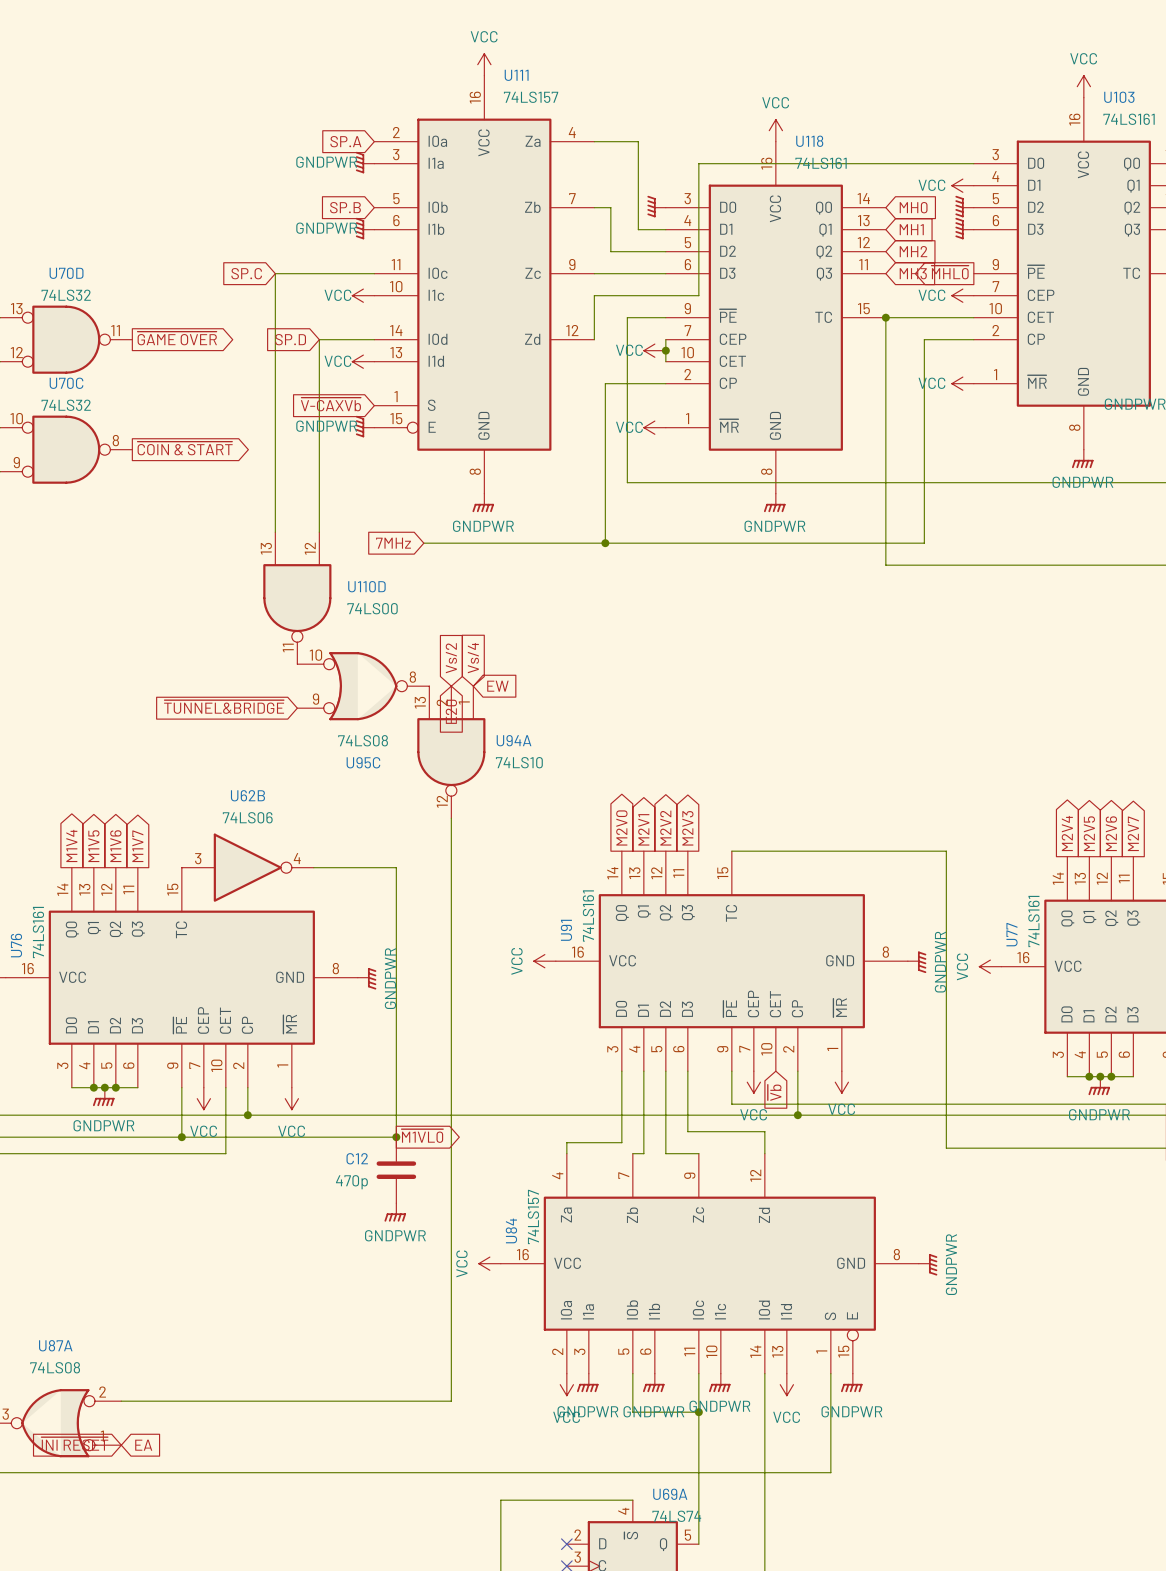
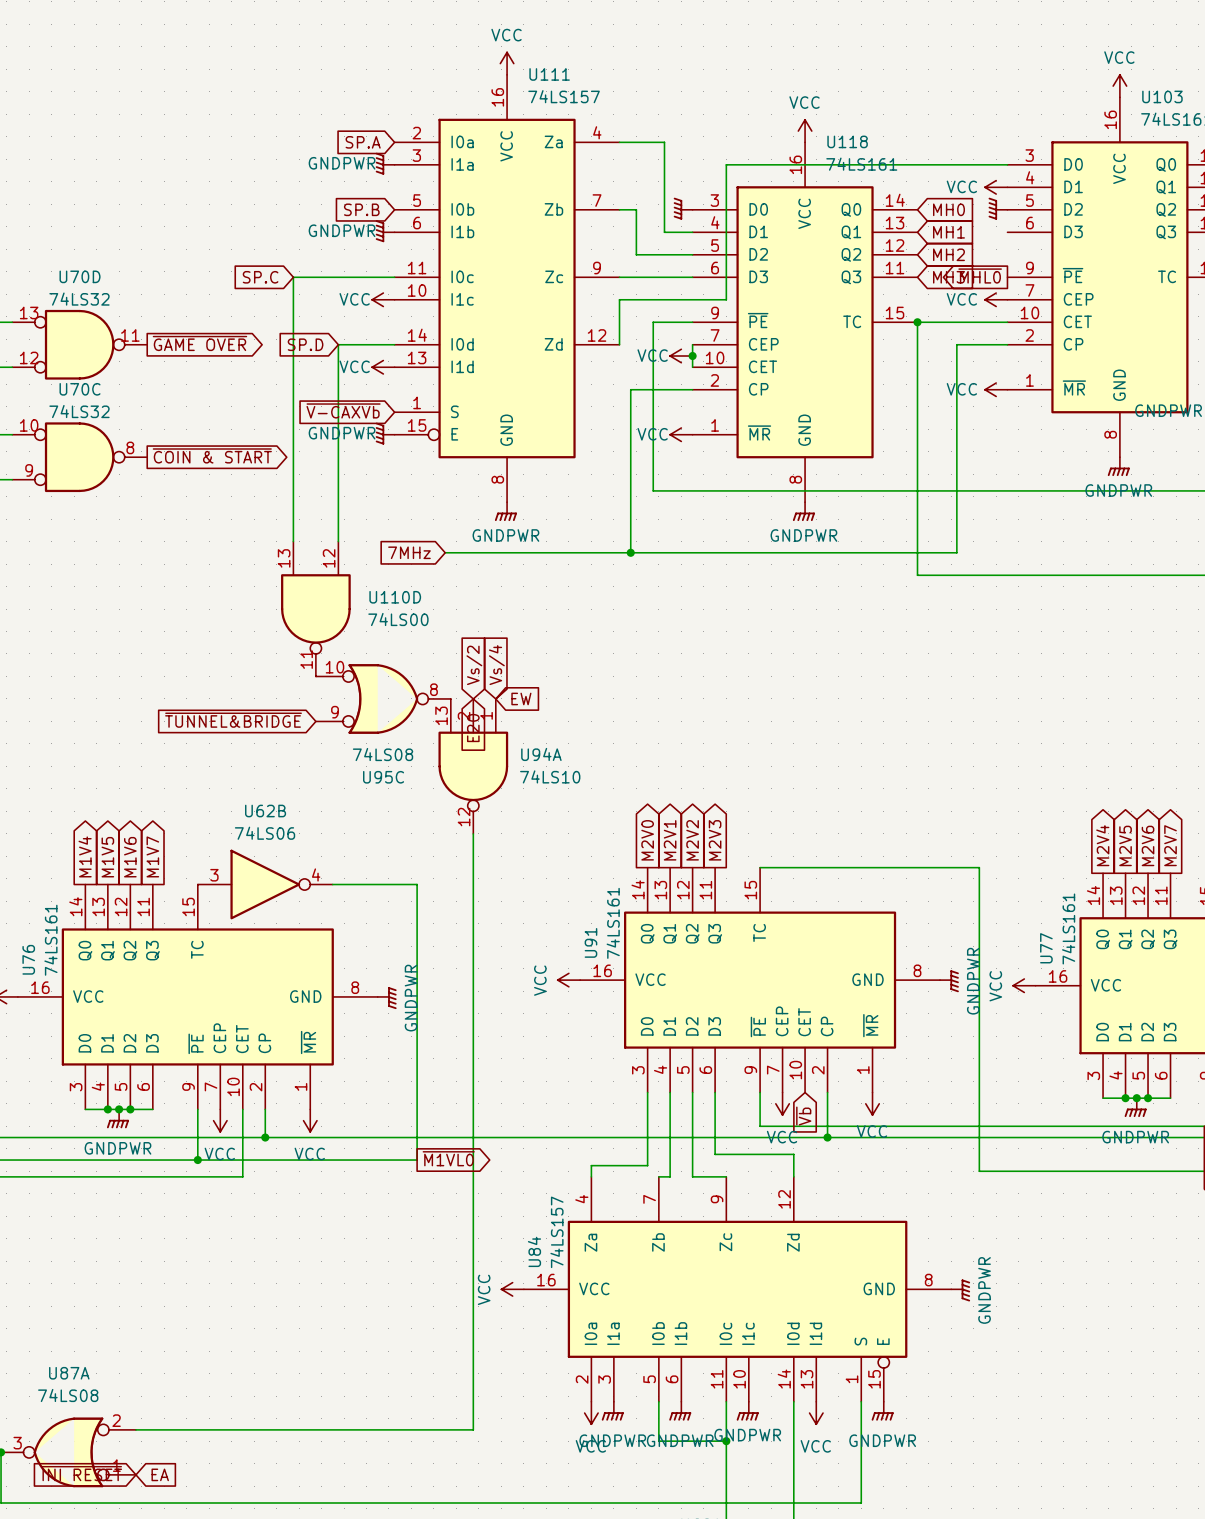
power symbol: (964, 228) -> none
junction: (396, 1137) -> none
C12: 470p (396, 1170) -> none
power symbol: GNDPWR (395, 1212) -> none

